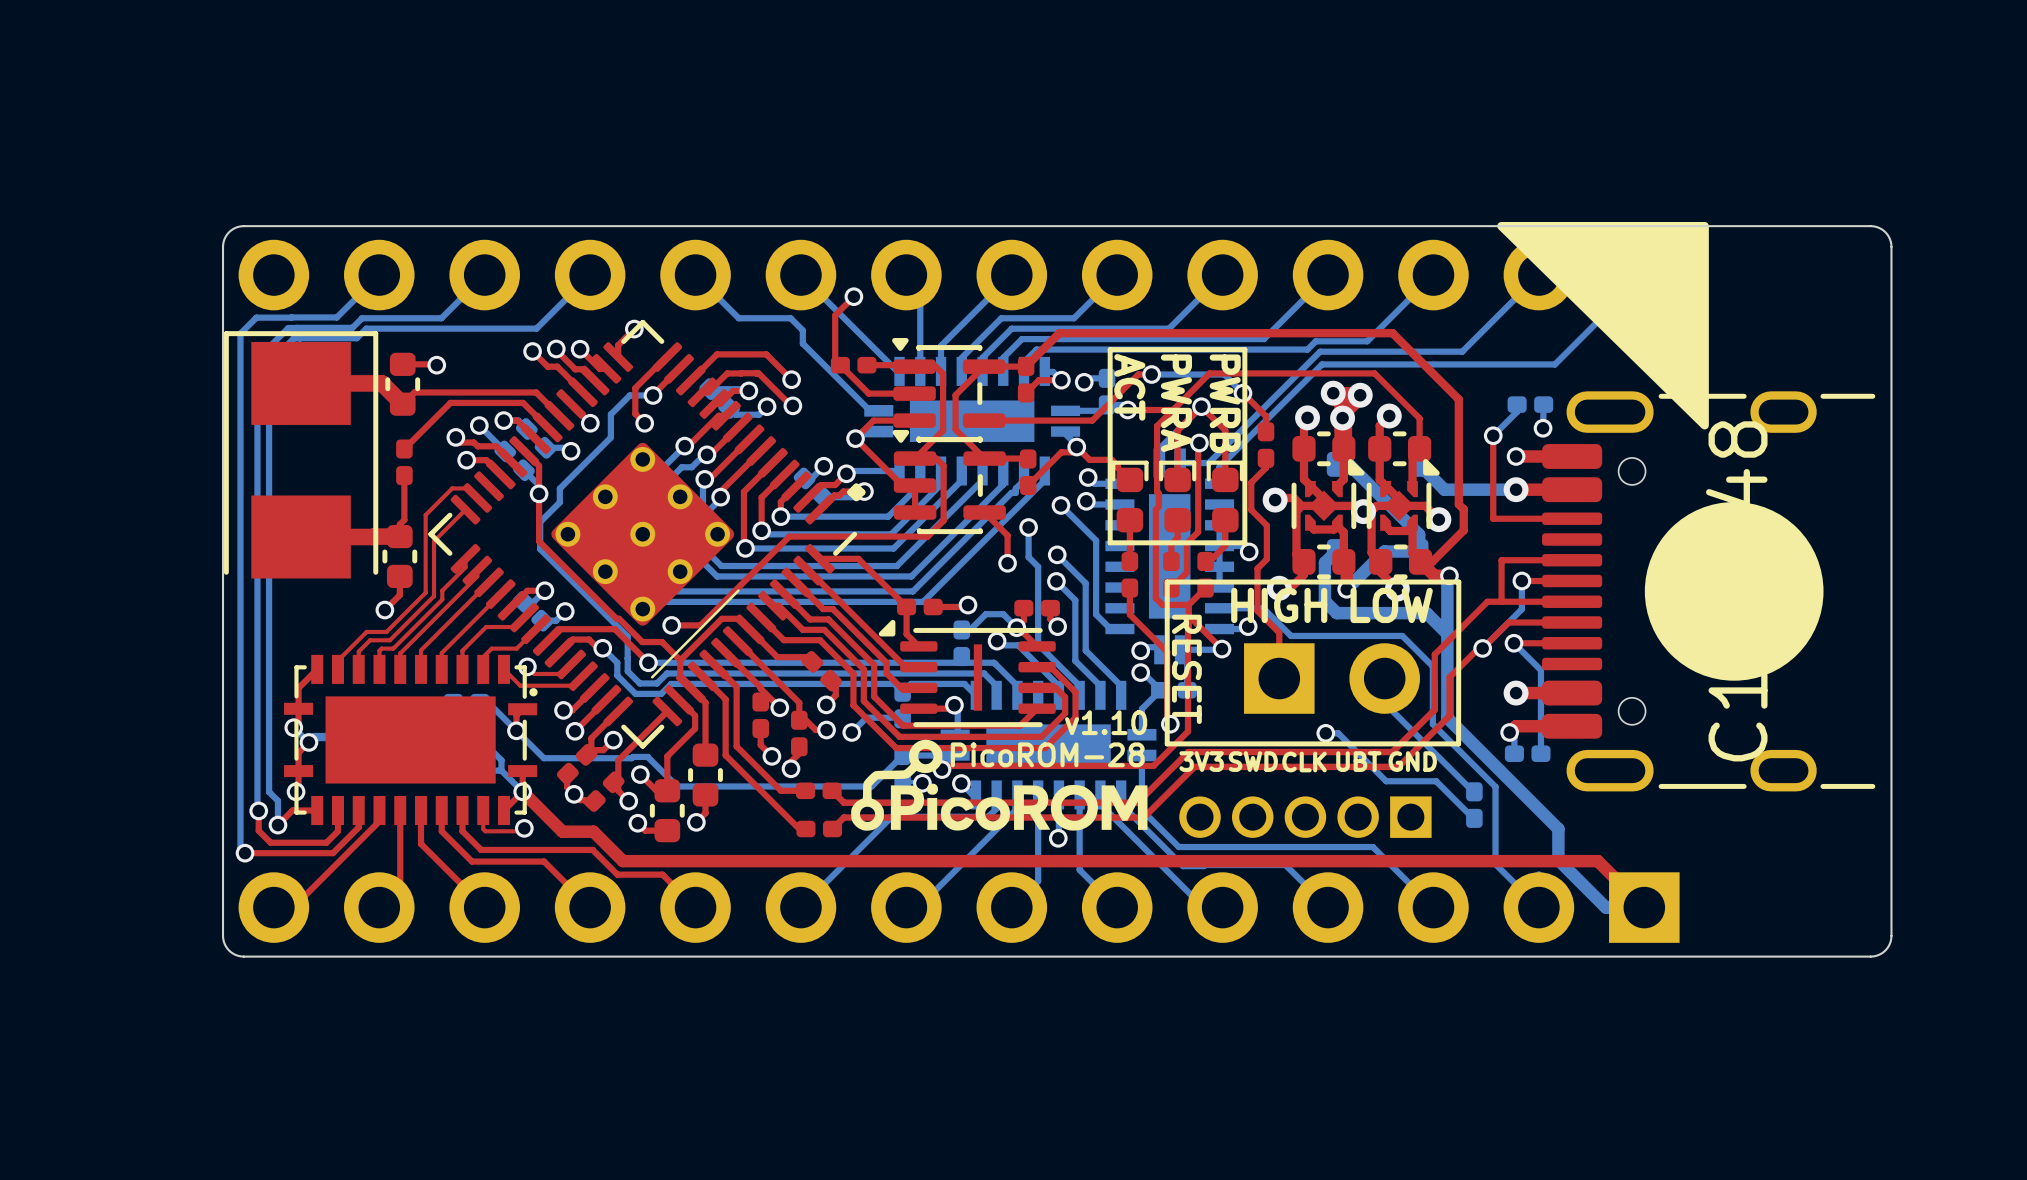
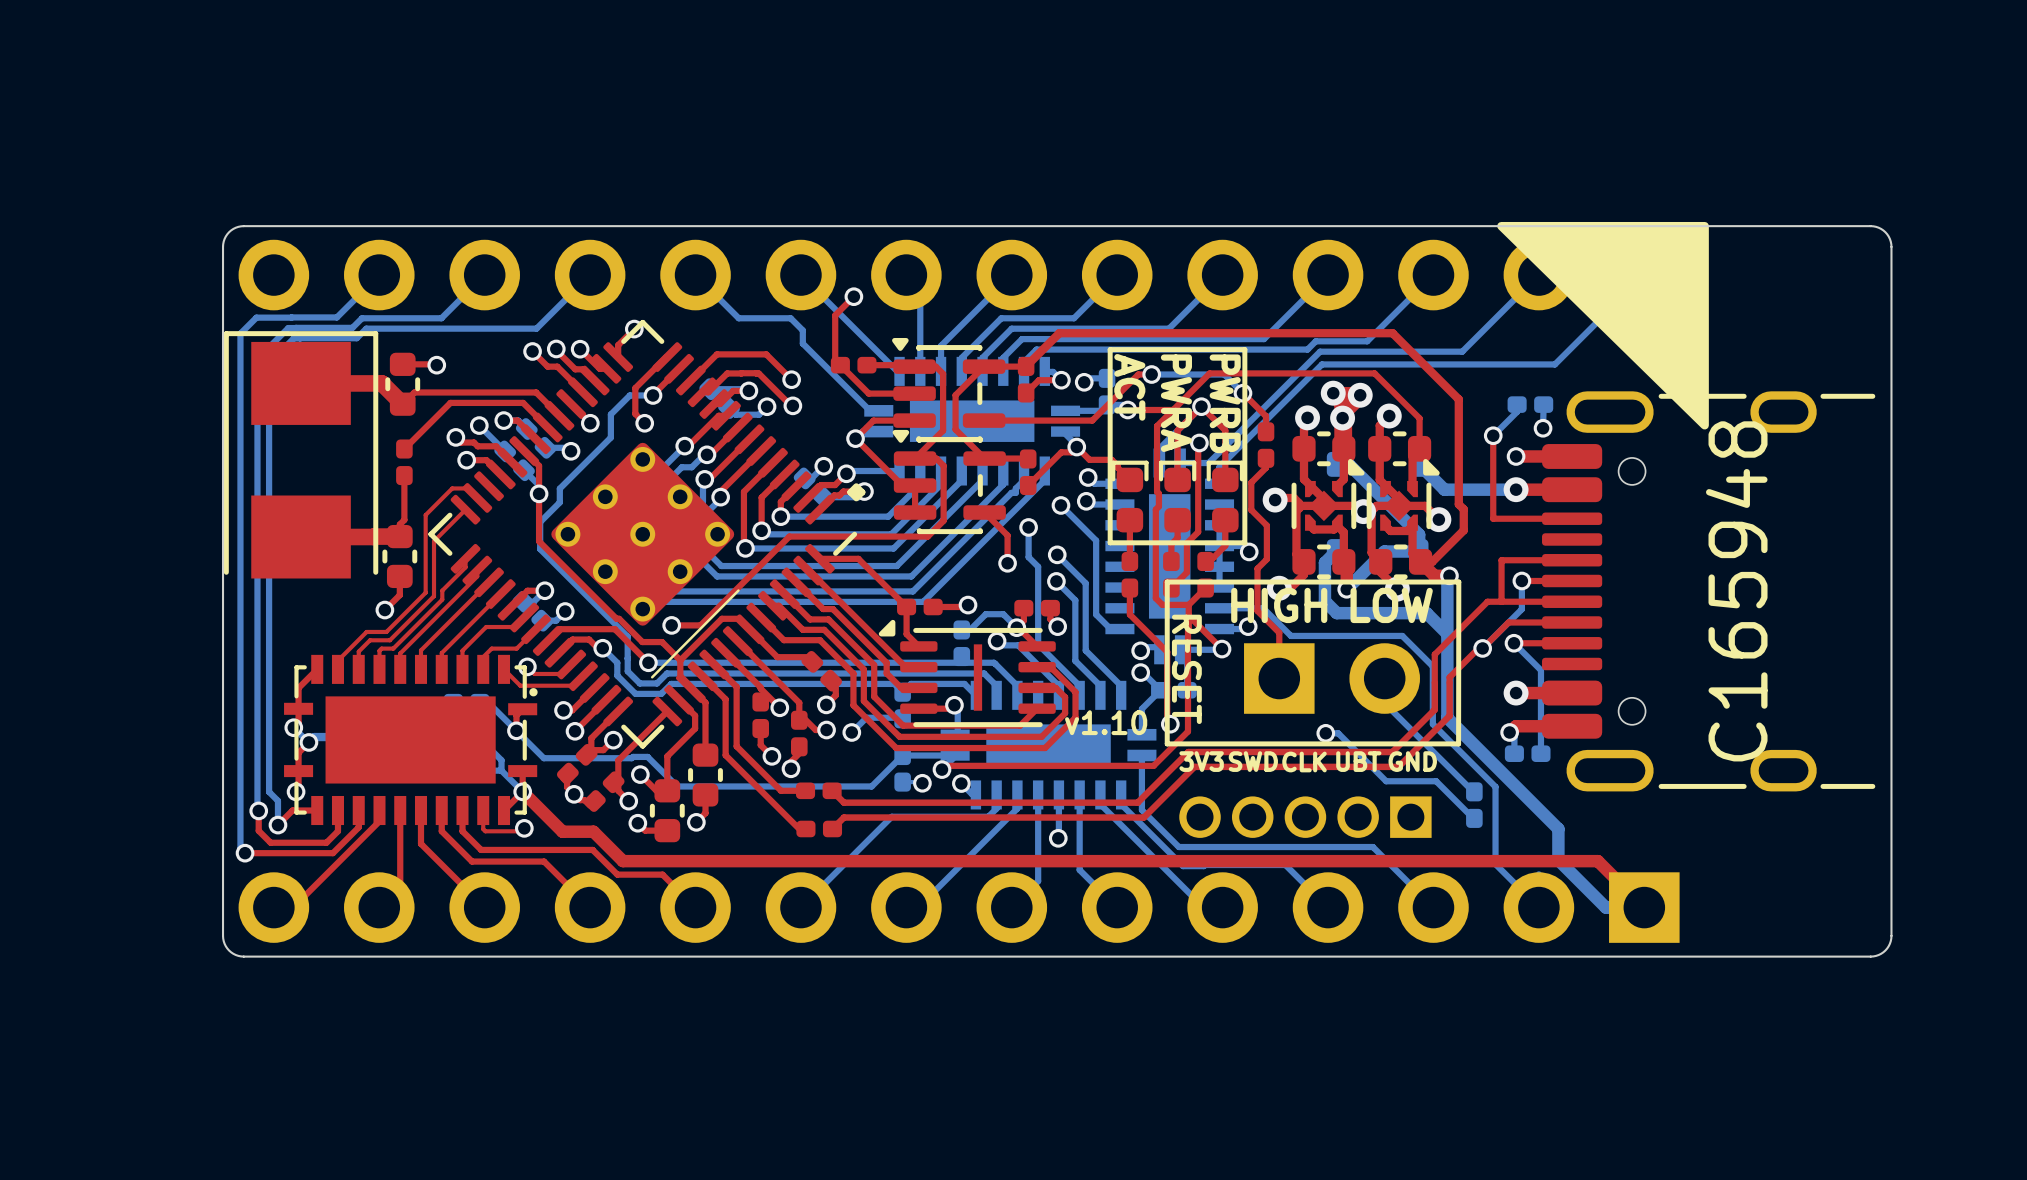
drawing: [1644, 502, 1824, 681] -> none
drawing: [851, 739, 1148, 831] -> none
text: PicoROM-28 (1047, 754) -> none

